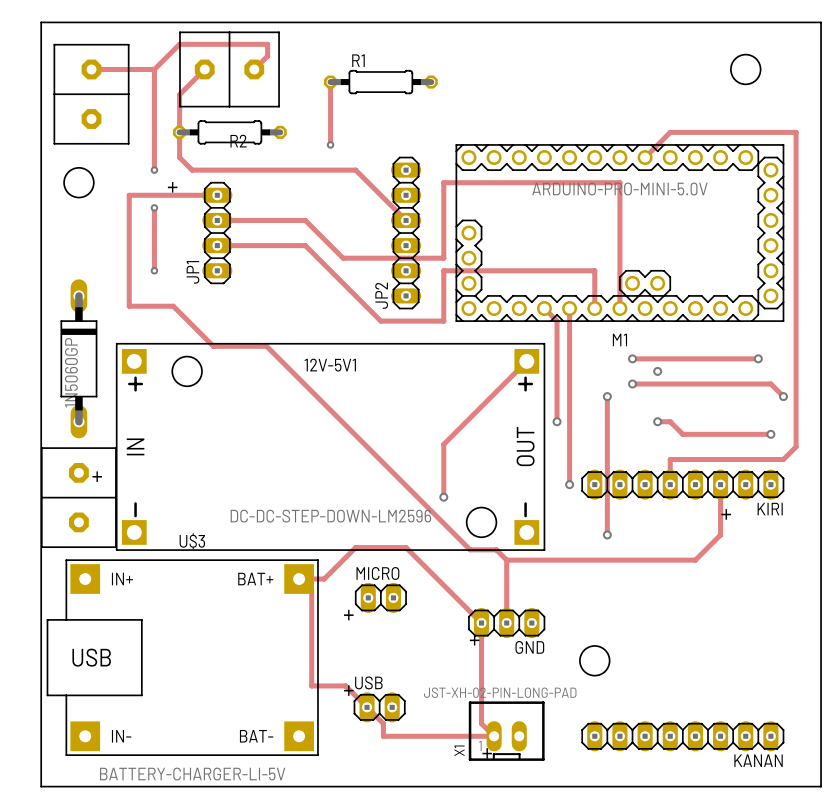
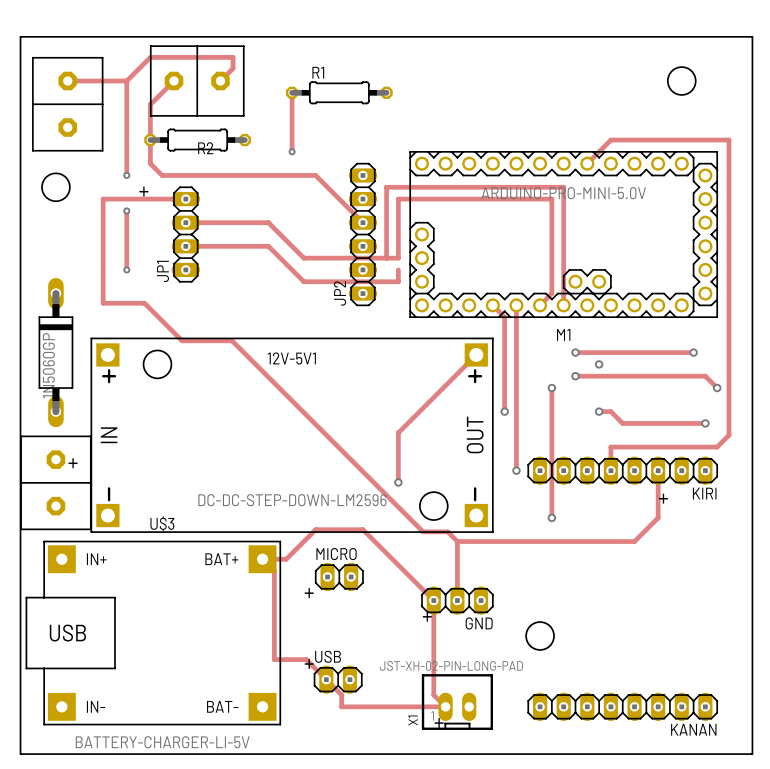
track: (443, 182) (443, 195) -> (398, 187) (386, 187) (386, 258)
track: (443, 270) (594, 270) (594, 308) -> (398, 199) (551, 199) (551, 293) (540, 305)
track: (343, 283) (380, 321) (443, 321) (443, 283) -> (303, 281) (398, 281)

